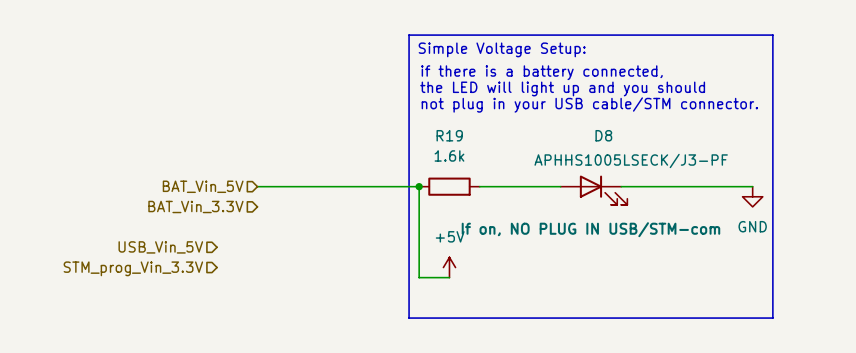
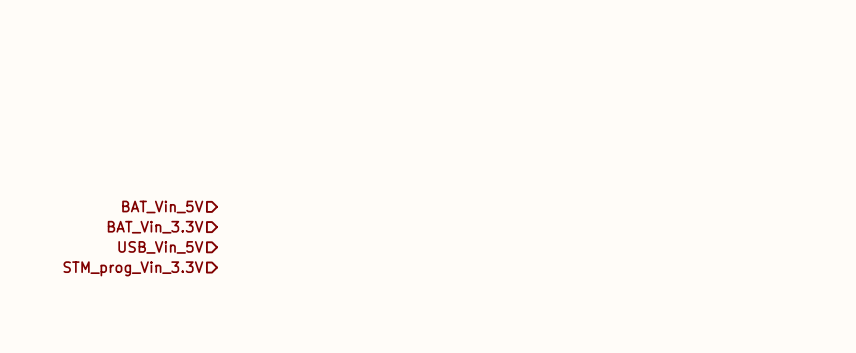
line: (409, 35) (772, 35) (772, 318) (409, 318) (409, 35) -> none
text: Simple Voltage Setup: (502, 49) -> none
text: if there is a battery connected, (541, 72) -> none
text: the LED will light up and you should (562, 88) -> none
text: not plug in your USB cable/STM connector. (589, 105) -> none
hierarchical label position: BAT_Vin_5V (203, 186) -> BAT_Vin_5V (162, 206)
wire: (257, 186) (419, 186) (419, 277) (449, 277) -> none
junction: (419, 186) -> none
R19: 1.6k (449, 186) -> none
wire: (479, 186) (560, 186) -> none
wire: (621, 186) (752, 186) -> none
D8: APHHS1005LSECK/J3-PF (593, 190) -> none
power symbol: GND (752, 196) -> none
hierarchical label position: BAT_Vin_3.3V (195, 206) -> BAT_Vin_3.3V (155, 227)
power symbol: +5V (449, 267) -> none

